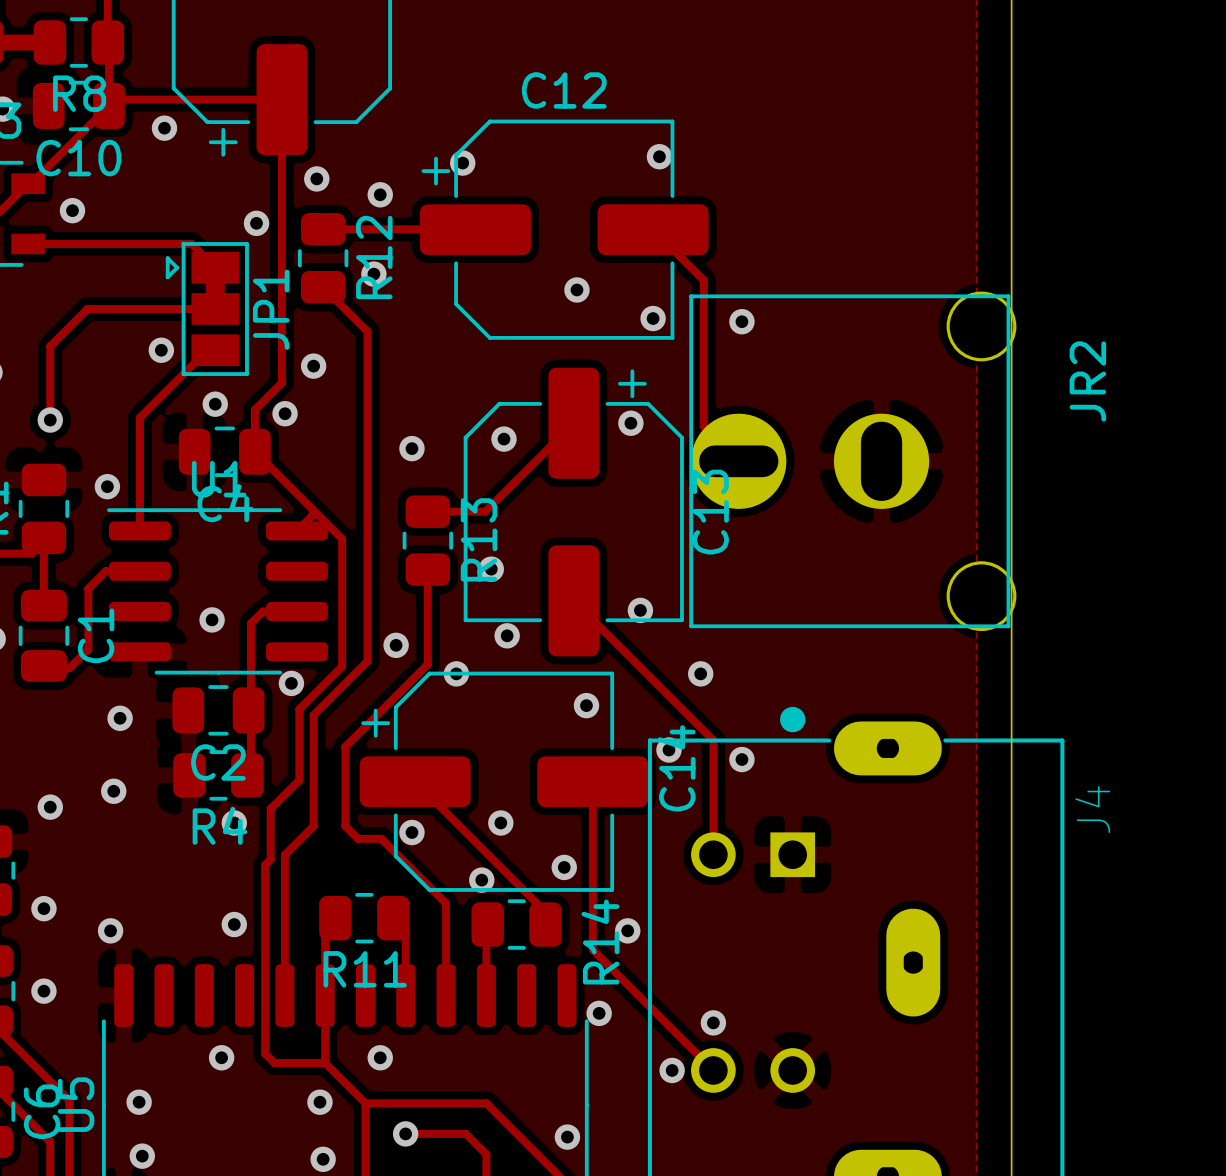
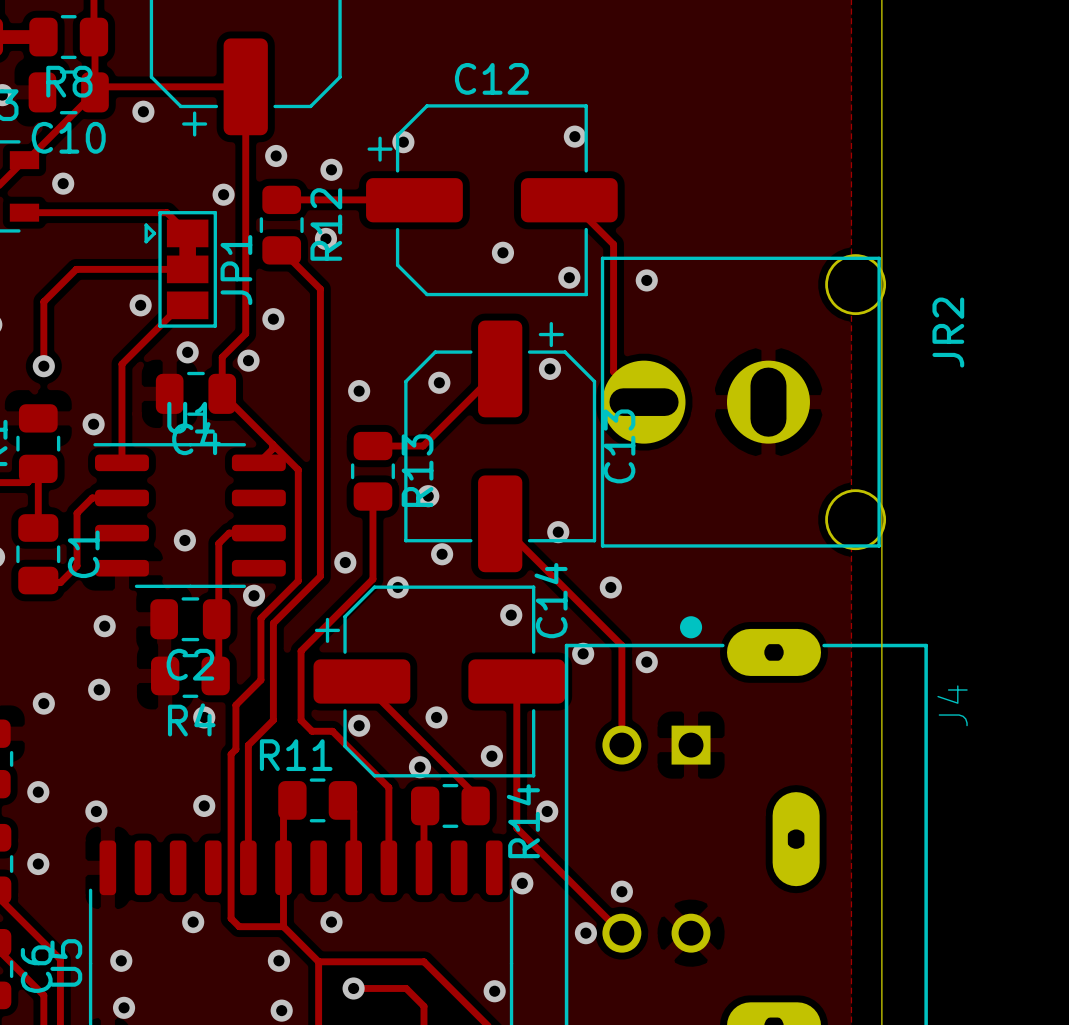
C14 name position: C14 (676, 768) -> C14 (551, 600)
R11 name position: R11 (365, 969) -> R11 (296, 755)

